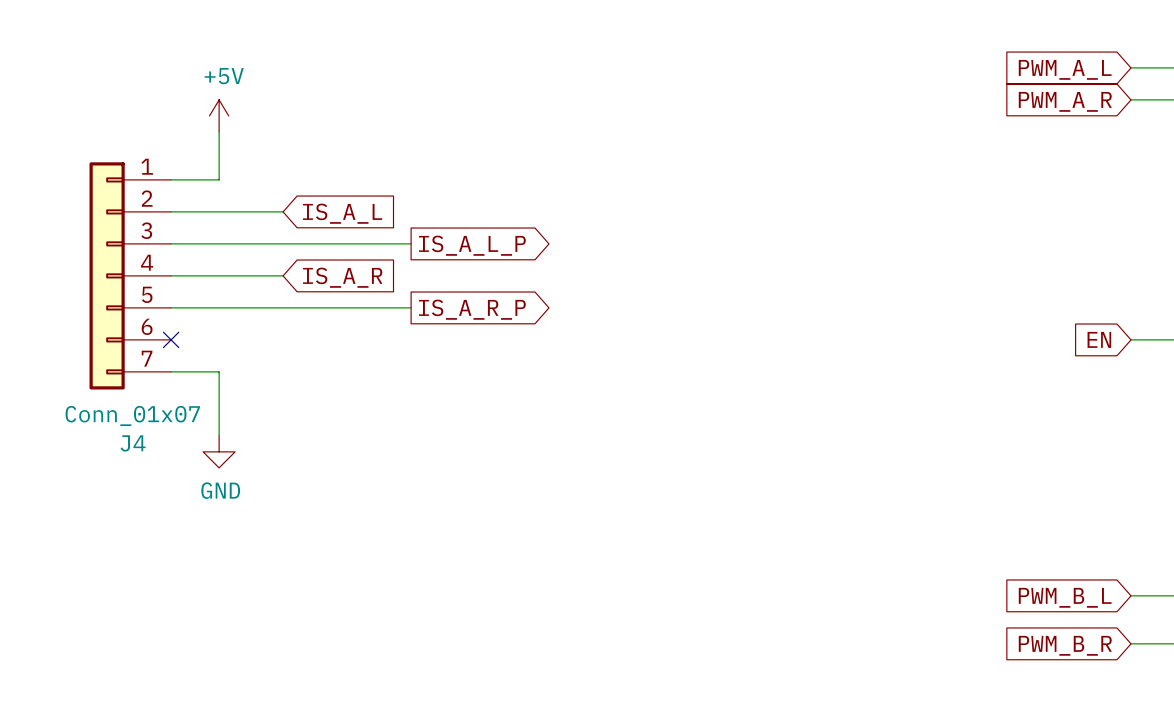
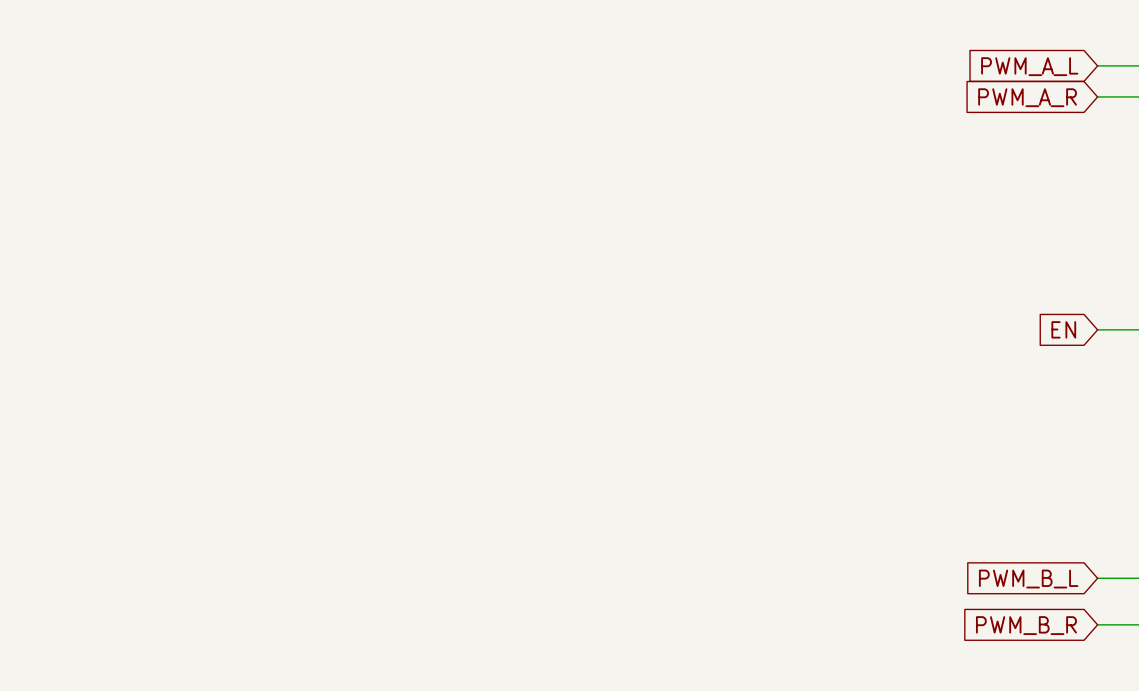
power symbol: +5V (219, 115) -> none
wire: (219, 131) (219, 179) (171, 179) -> none
wire: (171, 211) (283, 211) -> none
global label: IS_A_L (342, 213) -> none
wire: (171, 243) (411, 243) -> none
global label: IS_A_L_P (472, 245) -> none
J4: Conn_01x07 (130, 275) -> none
wire: (171, 275) (283, 275) -> none
global label: IS_A_R (342, 277) -> none
wire: (171, 307) (411, 307) -> none
global label: IS_A_R_P (472, 309) -> none
no-connect mark: (171, 339) -> none
wire: (171, 371) (219, 371) (219, 435) -> none
power symbol: GND (219, 451) -> none

